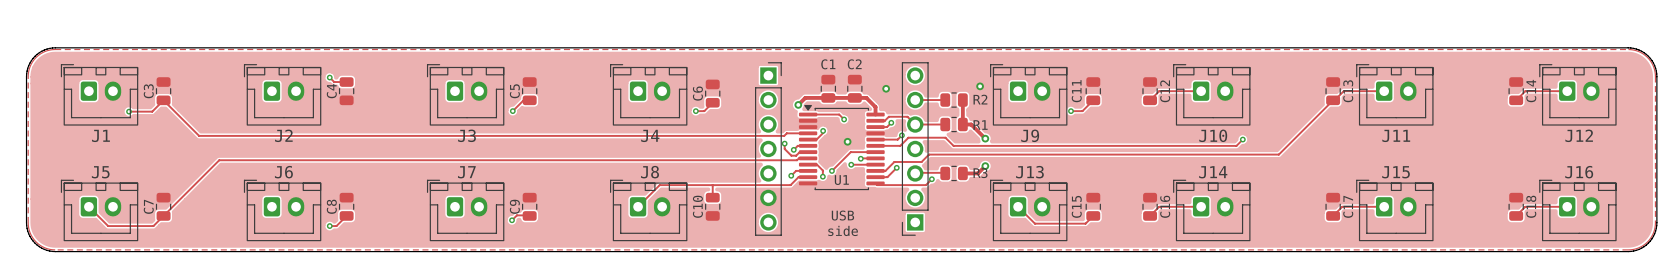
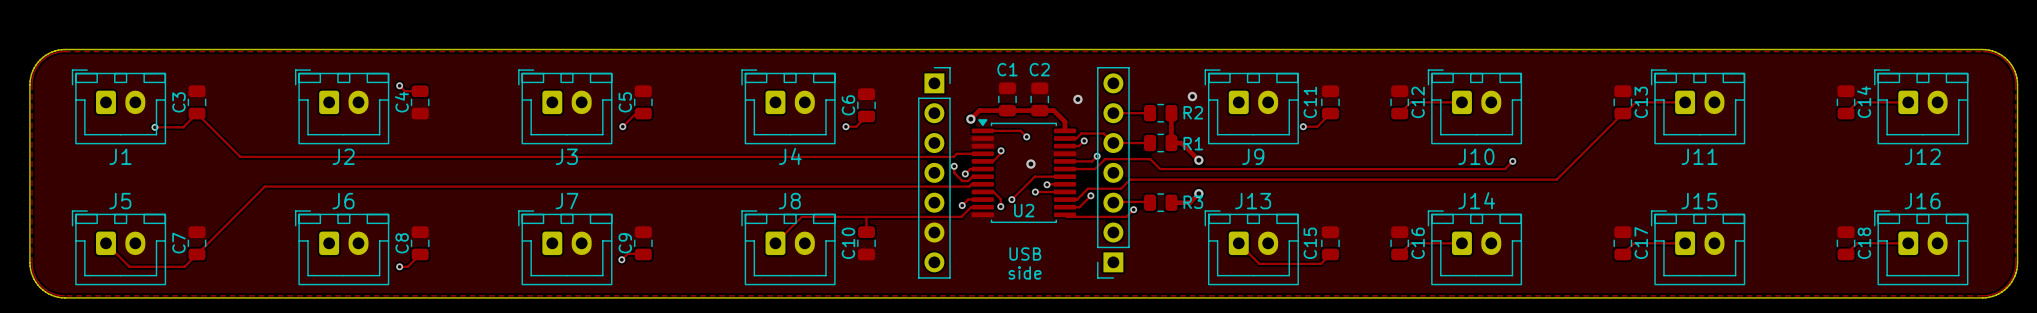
U1 name: U1 (841, 180) -> U2 (1024, 210)

